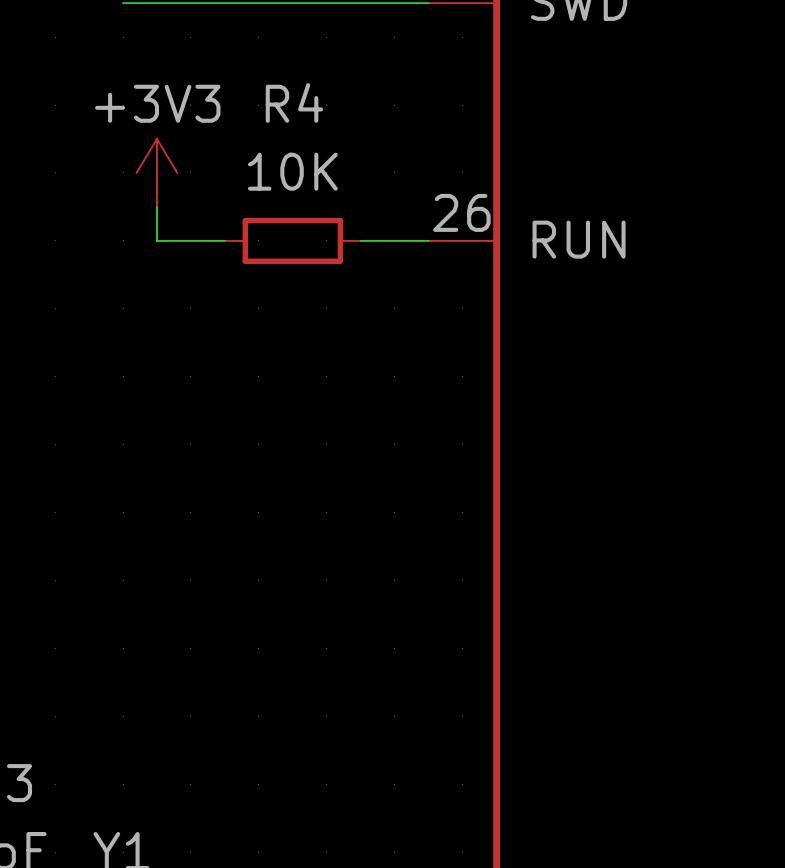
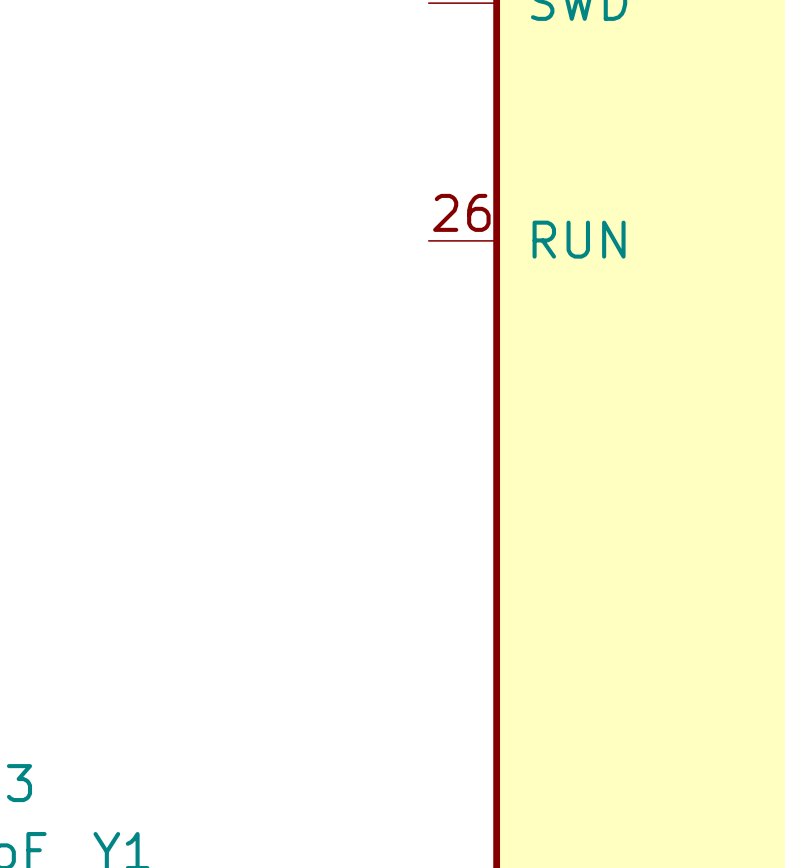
wire: (123, 3) (428, 3) -> none
power symbol: +3V3 (156, 172) -> none
wire: (156, 206) (156, 240) (224, 240) -> none
R4: 10K (292, 240) -> none
wire: (360, 240) (428, 240) -> none

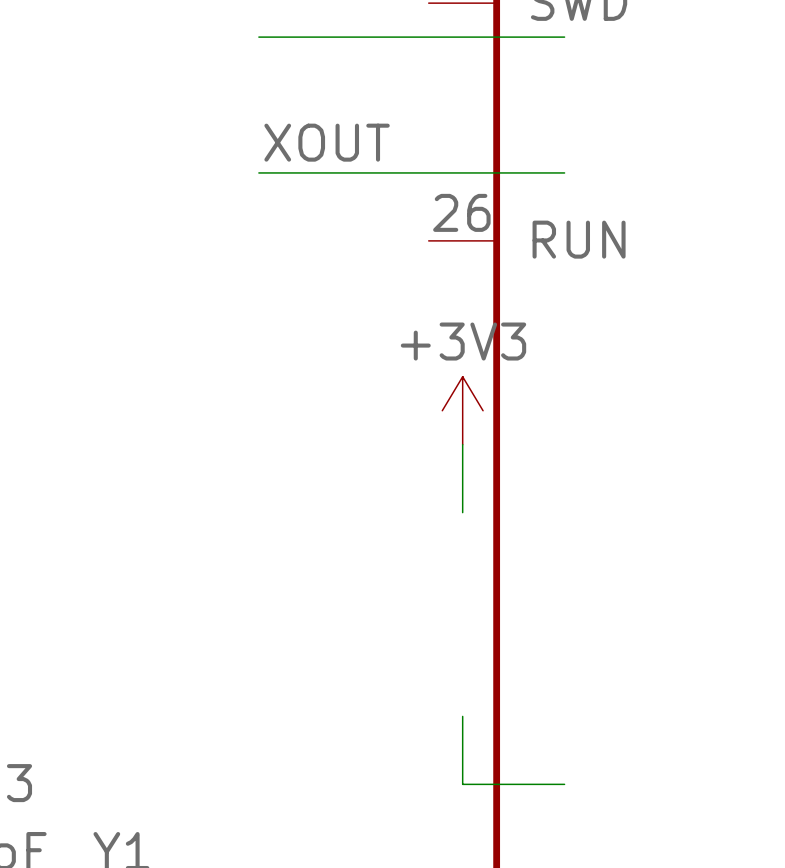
wire: none -> (258, 37) (564, 37)
label: none -> XOUT (327, 142)
wire: none -> (258, 172) (564, 172)
power symbol: none -> +3V3 (462, 410)
wire: none -> (462, 444) (462, 512)
wire: none -> (462, 716) (462, 784) (564, 784)

